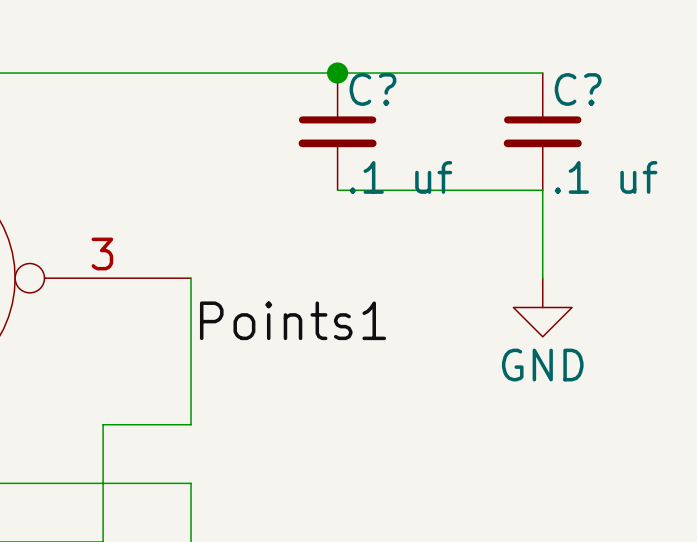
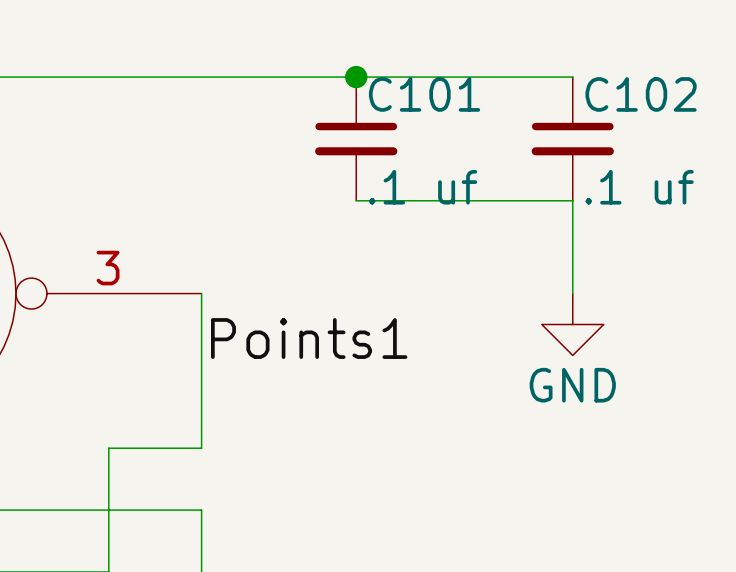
C? name: C? (372, 89) -> C101 (424, 94)
C? name: C? (578, 89) -> C102 (641, 94)

